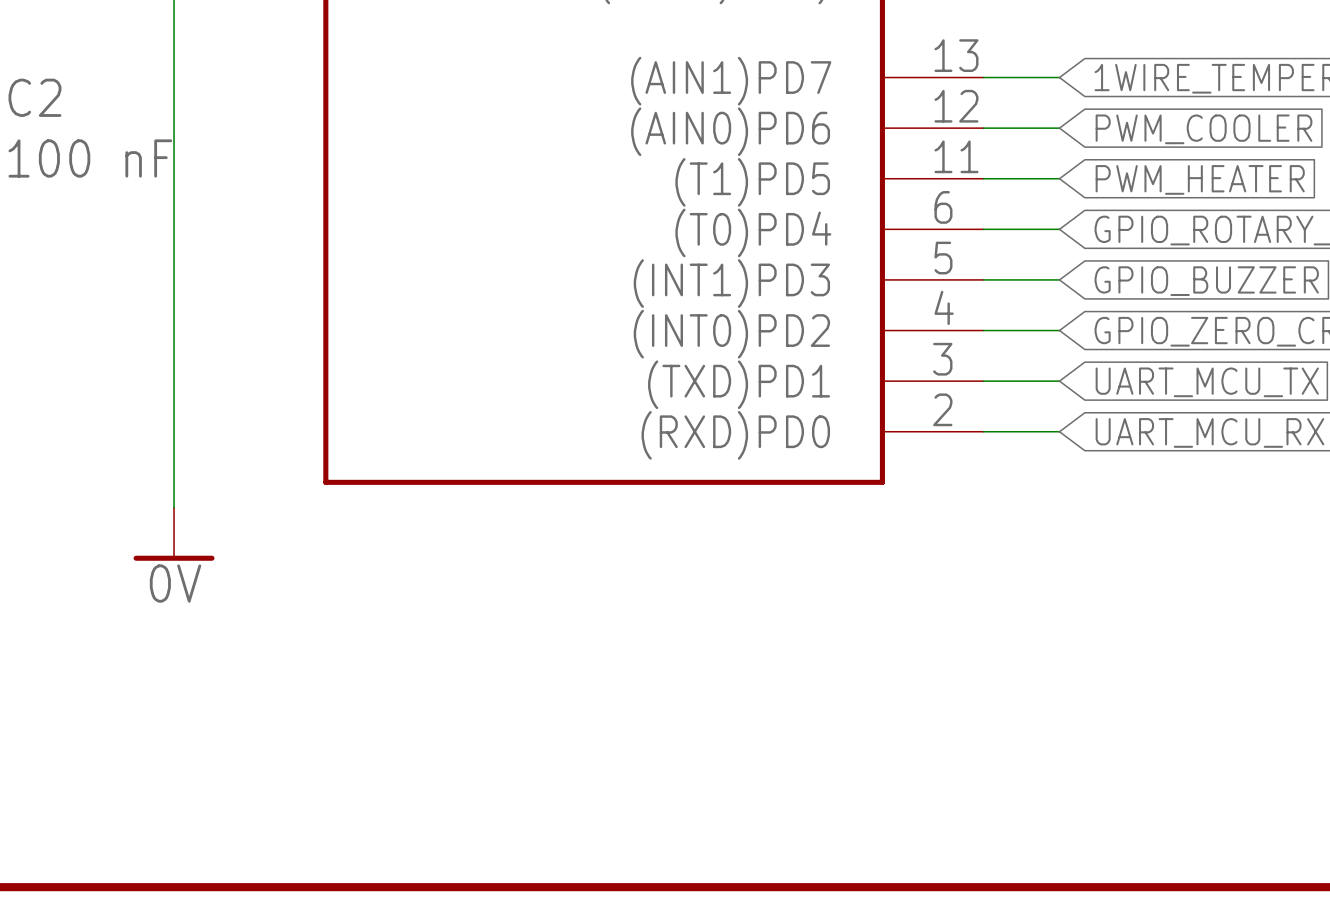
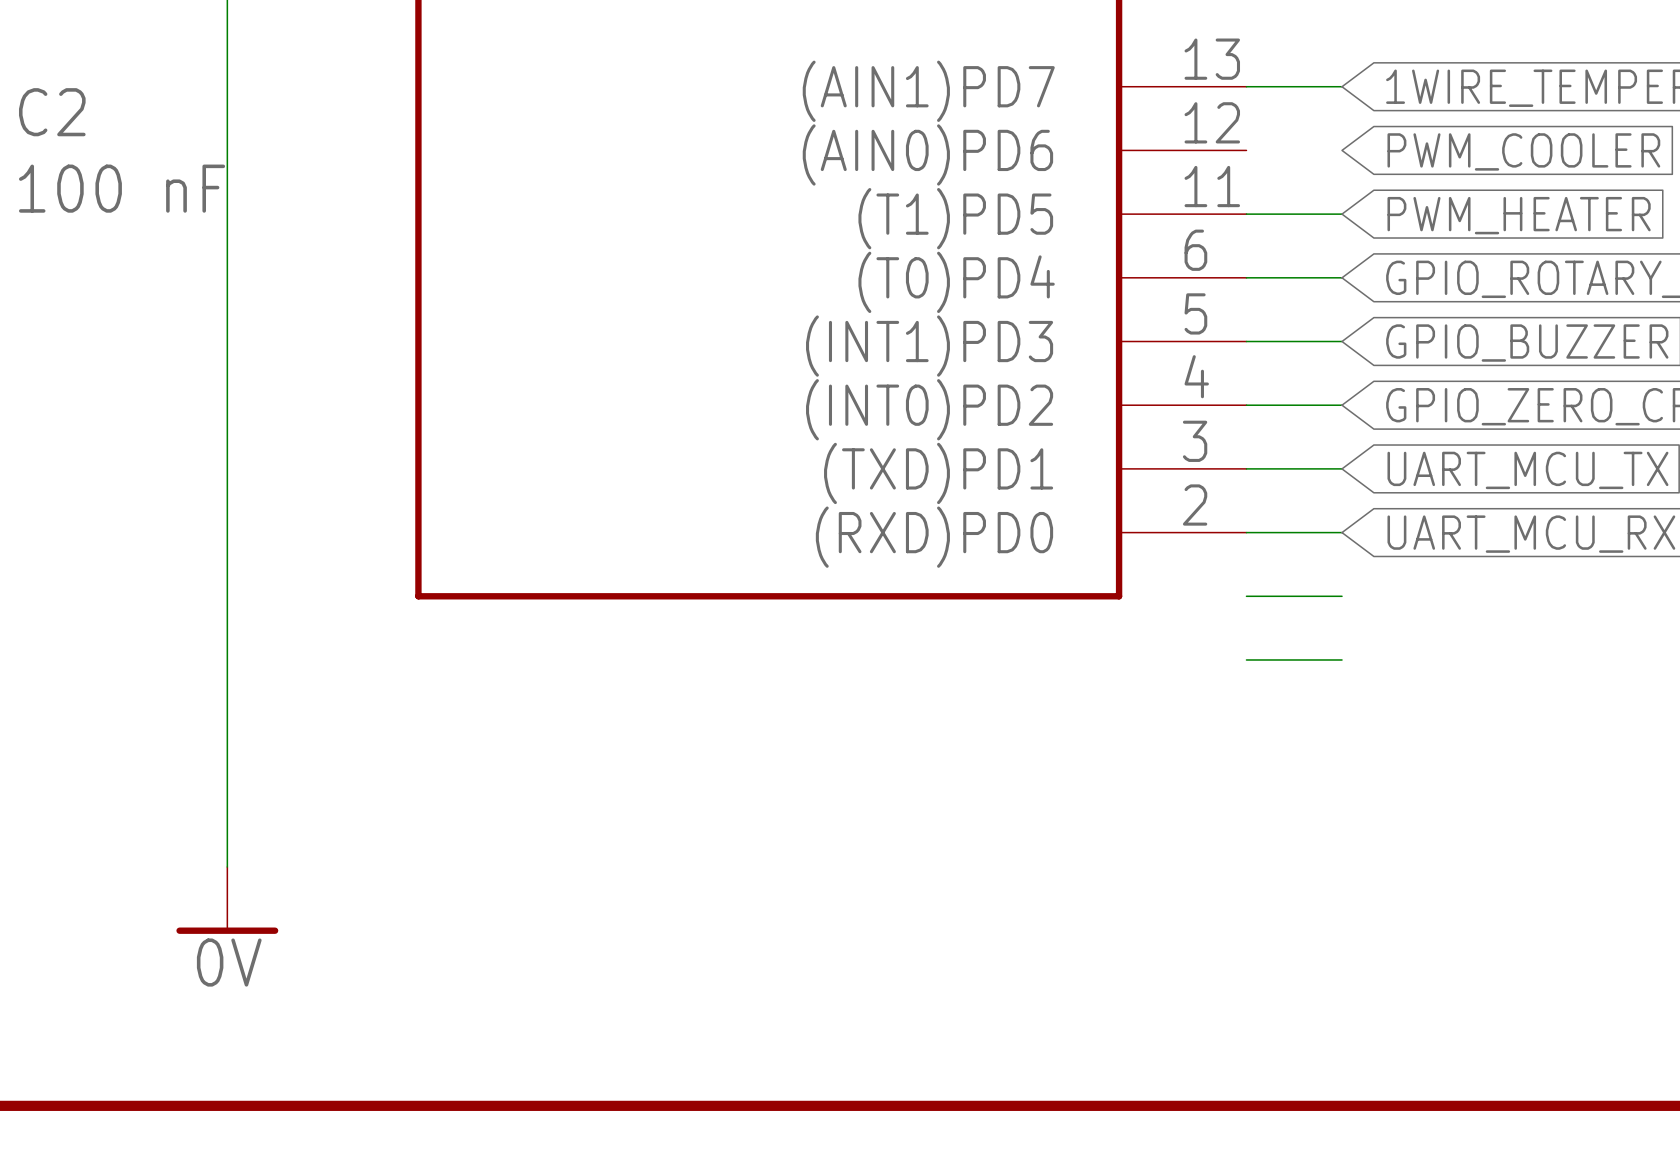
wire: (983, 128) (1059, 128) -> (1246, 596) (1342, 596)
wire: none -> (227, 628) (227, 867)
wire: none -> (1246, 659) (1342, 659)
power symbol: 0V (174, 534) -> none
power symbol: none -> 0V (227, 900)

